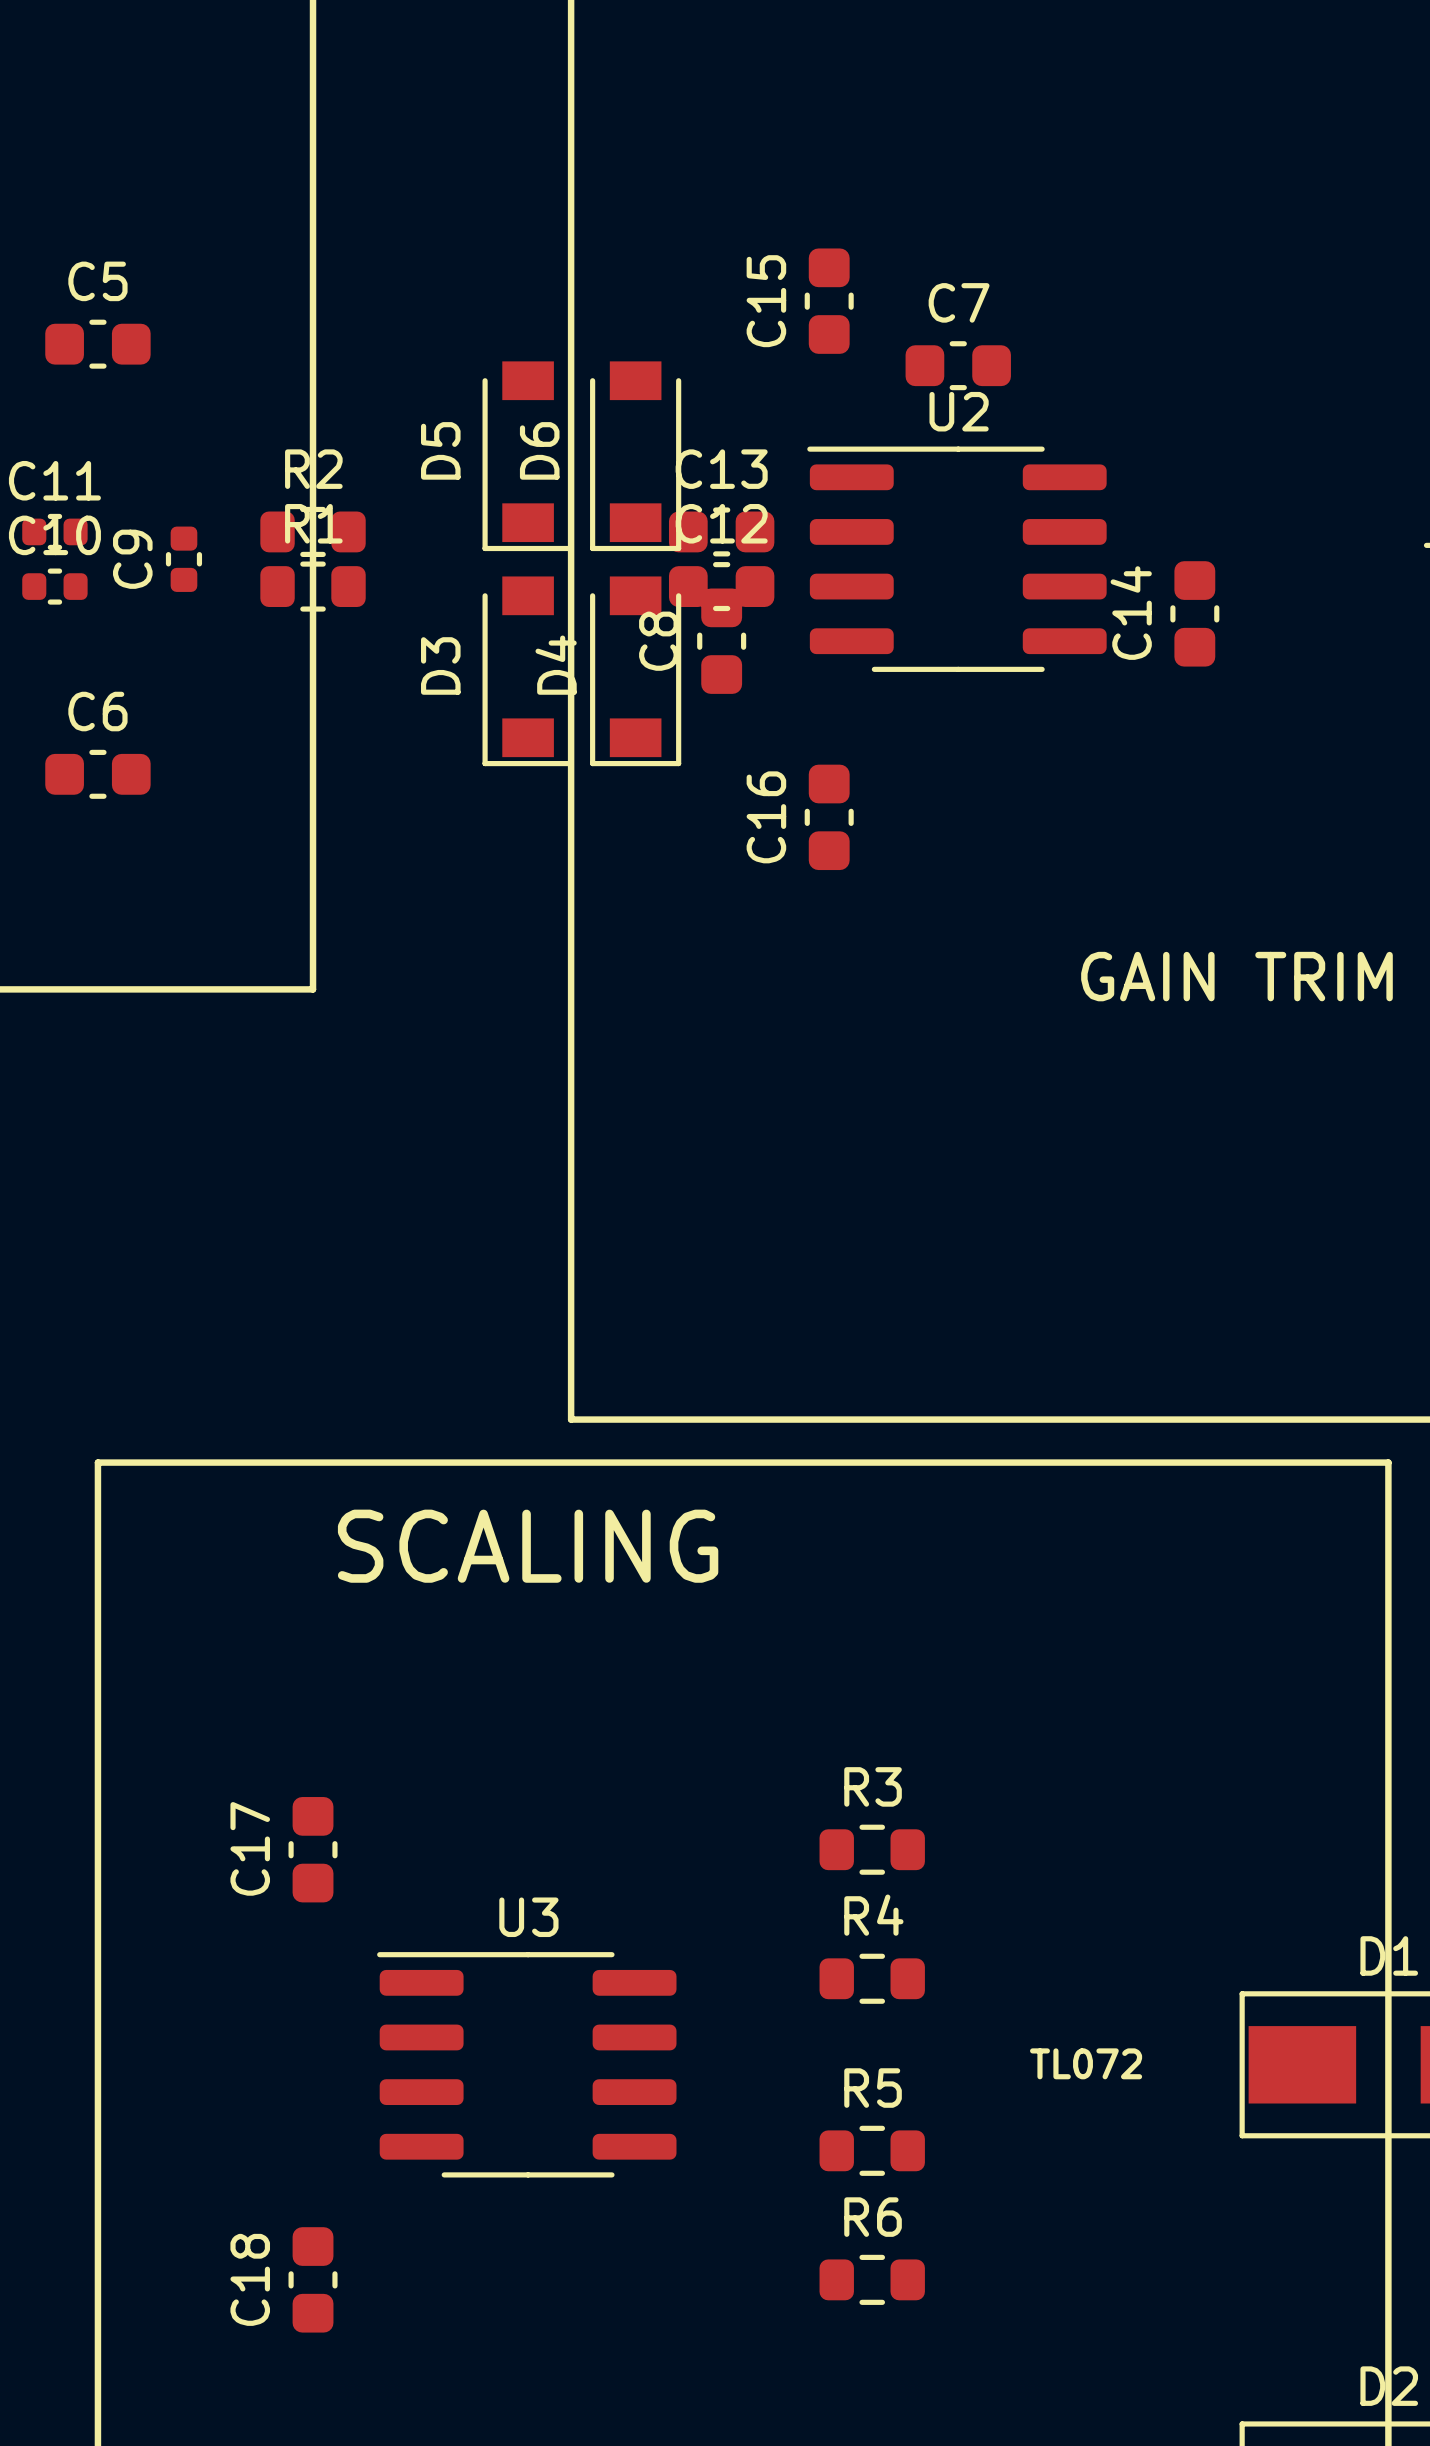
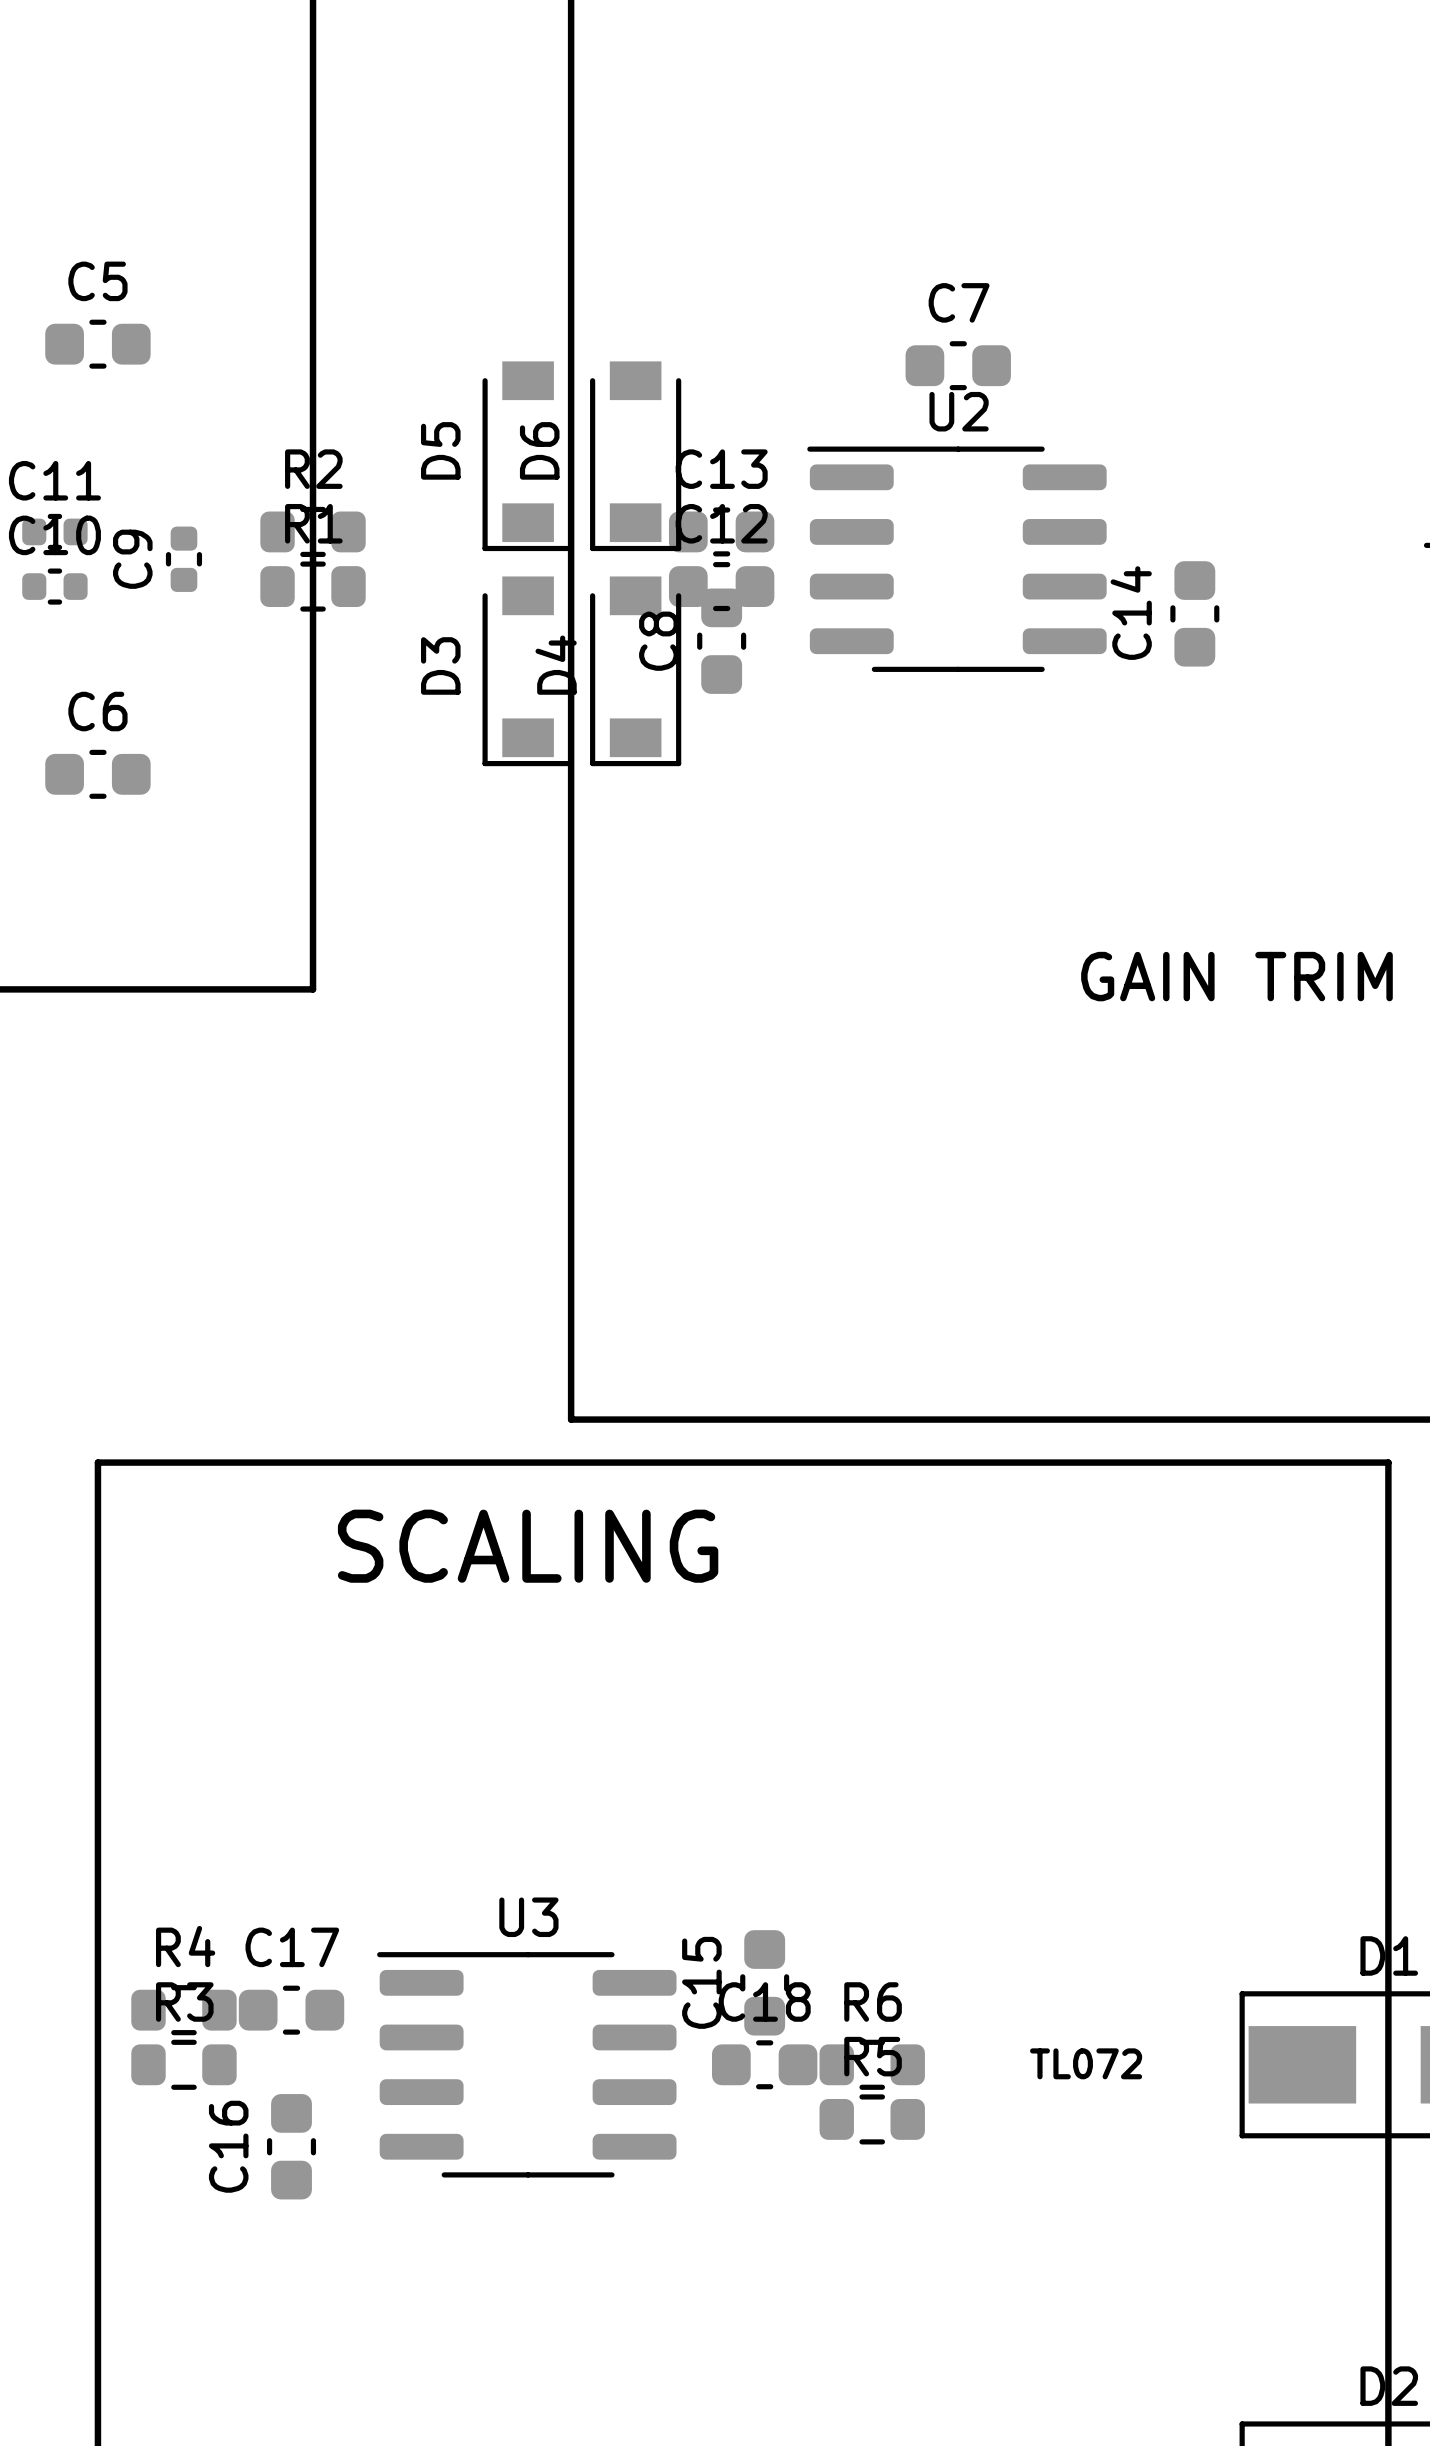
C15 position: (829, 301) -> (764, 1982)
C16 position: (829, 817) -> (291, 2146)
C17 rotation: 0° (313, 1849) -> 90° clockwise (291, 2010)
C17 position: (313, 1849) -> (291, 2010)
R3 position: (872, 1849) -> (183, 2064)
R4 position: (872, 1978) -> (183, 2010)
R5 position: (872, 2150) -> (872, 2119)
C18 rotation: 0° (313, 2279) -> 90° clockwise (764, 2064)
C18 position: (313, 2279) -> (764, 2064)
R6 position: (872, 2279) -> (872, 2064)

